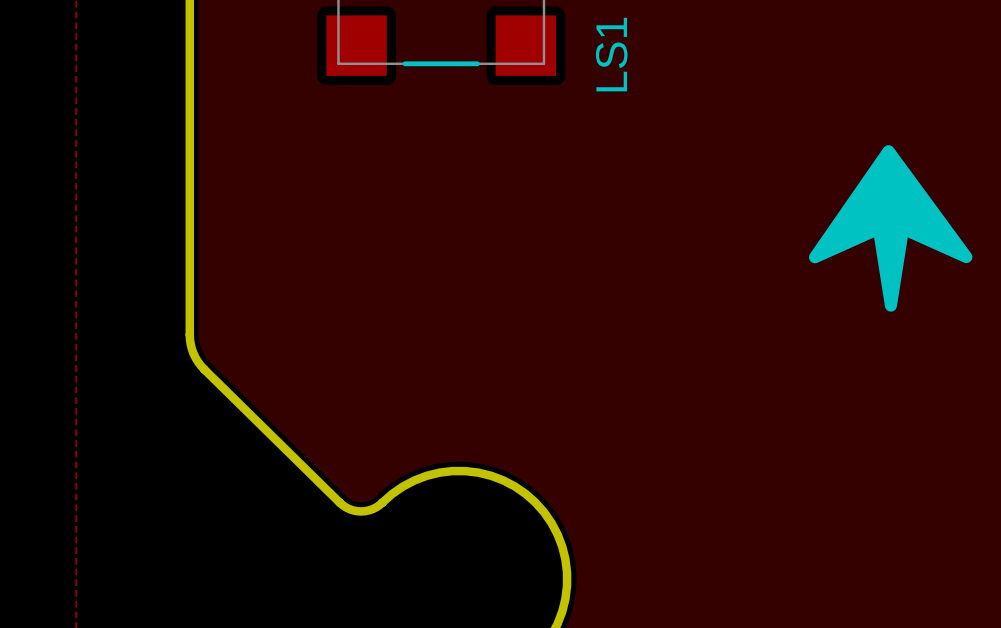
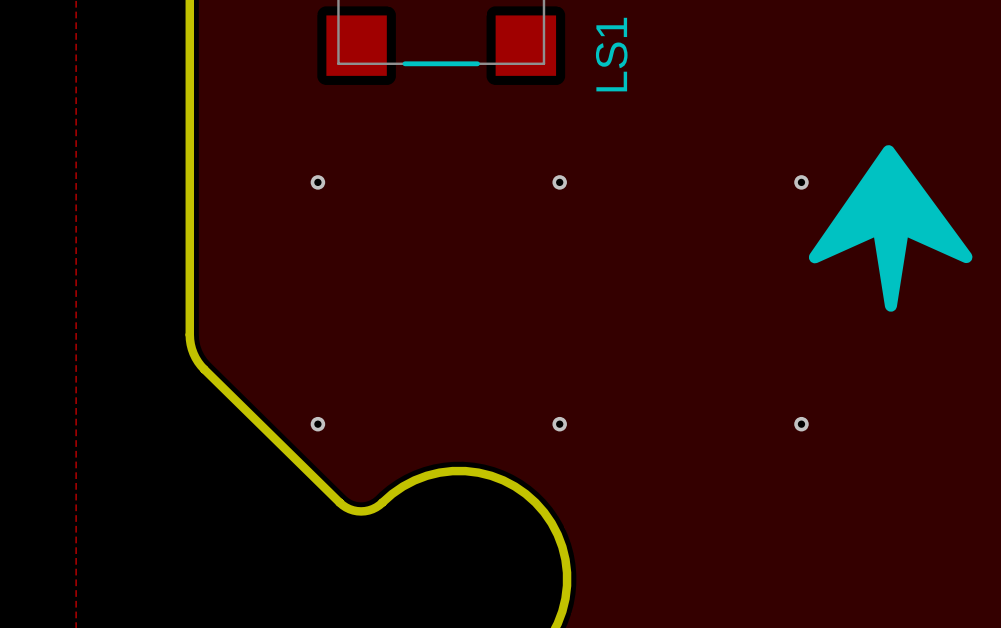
via: none -> (317, 182)
via: none -> (559, 182)
via: none -> (801, 182)
via: none -> (317, 424)
via: none -> (559, 424)
via: none -> (801, 424)

